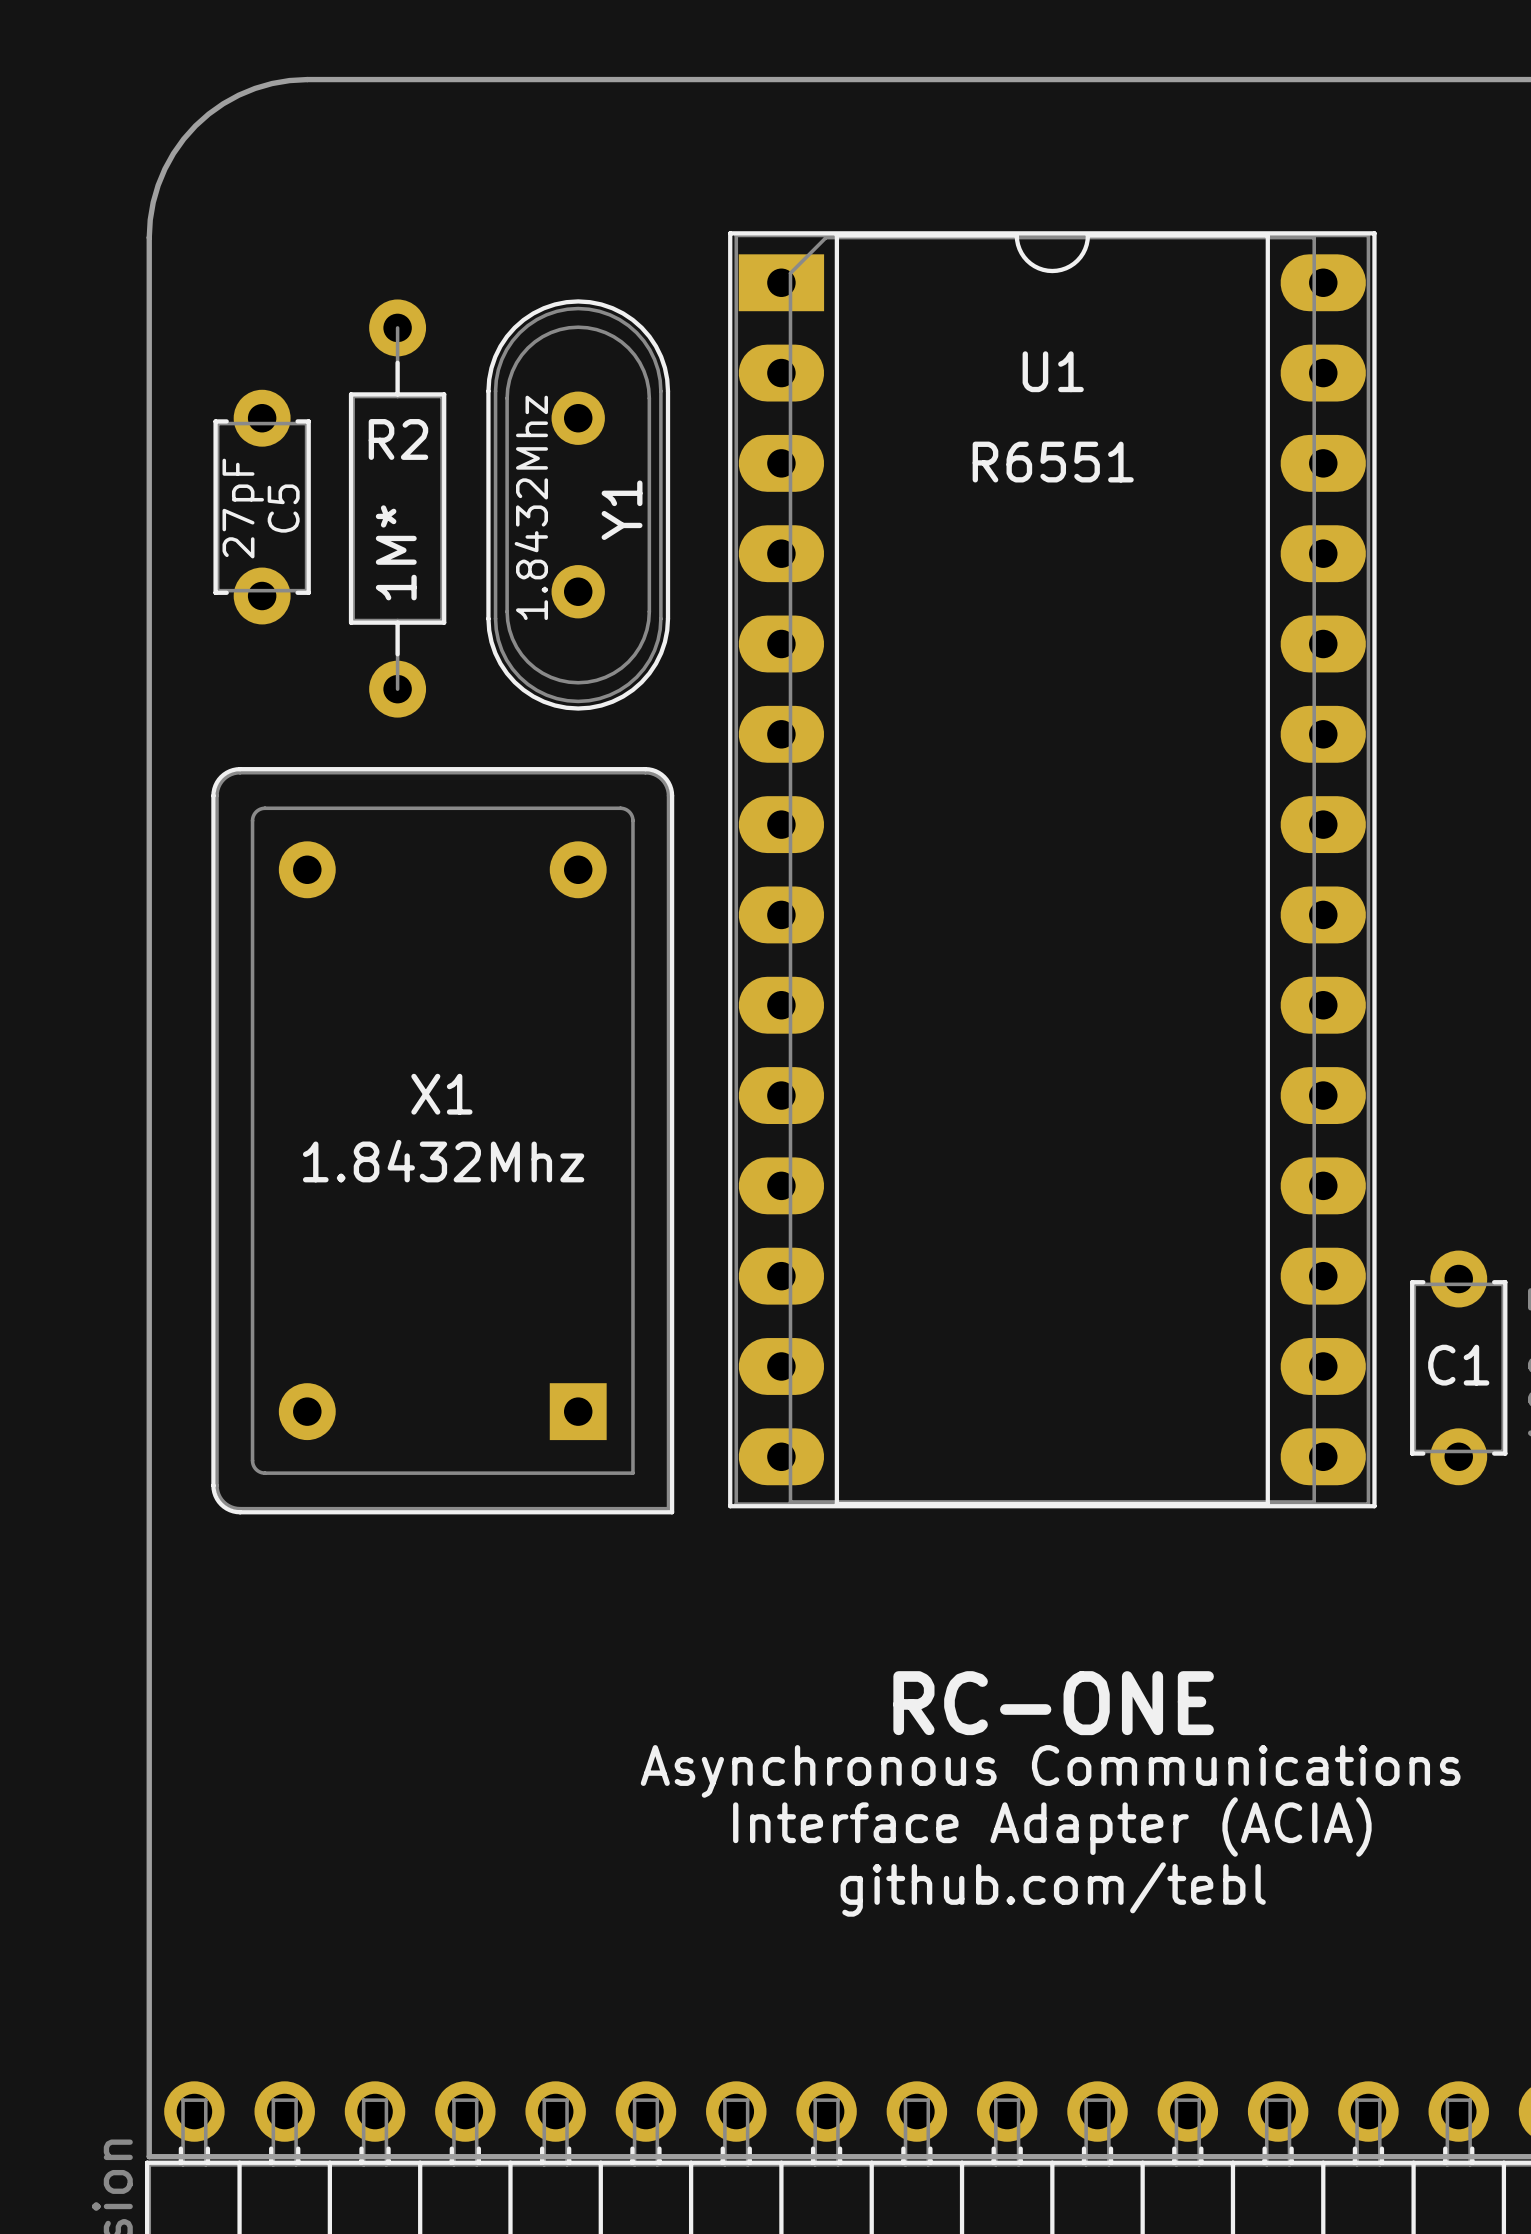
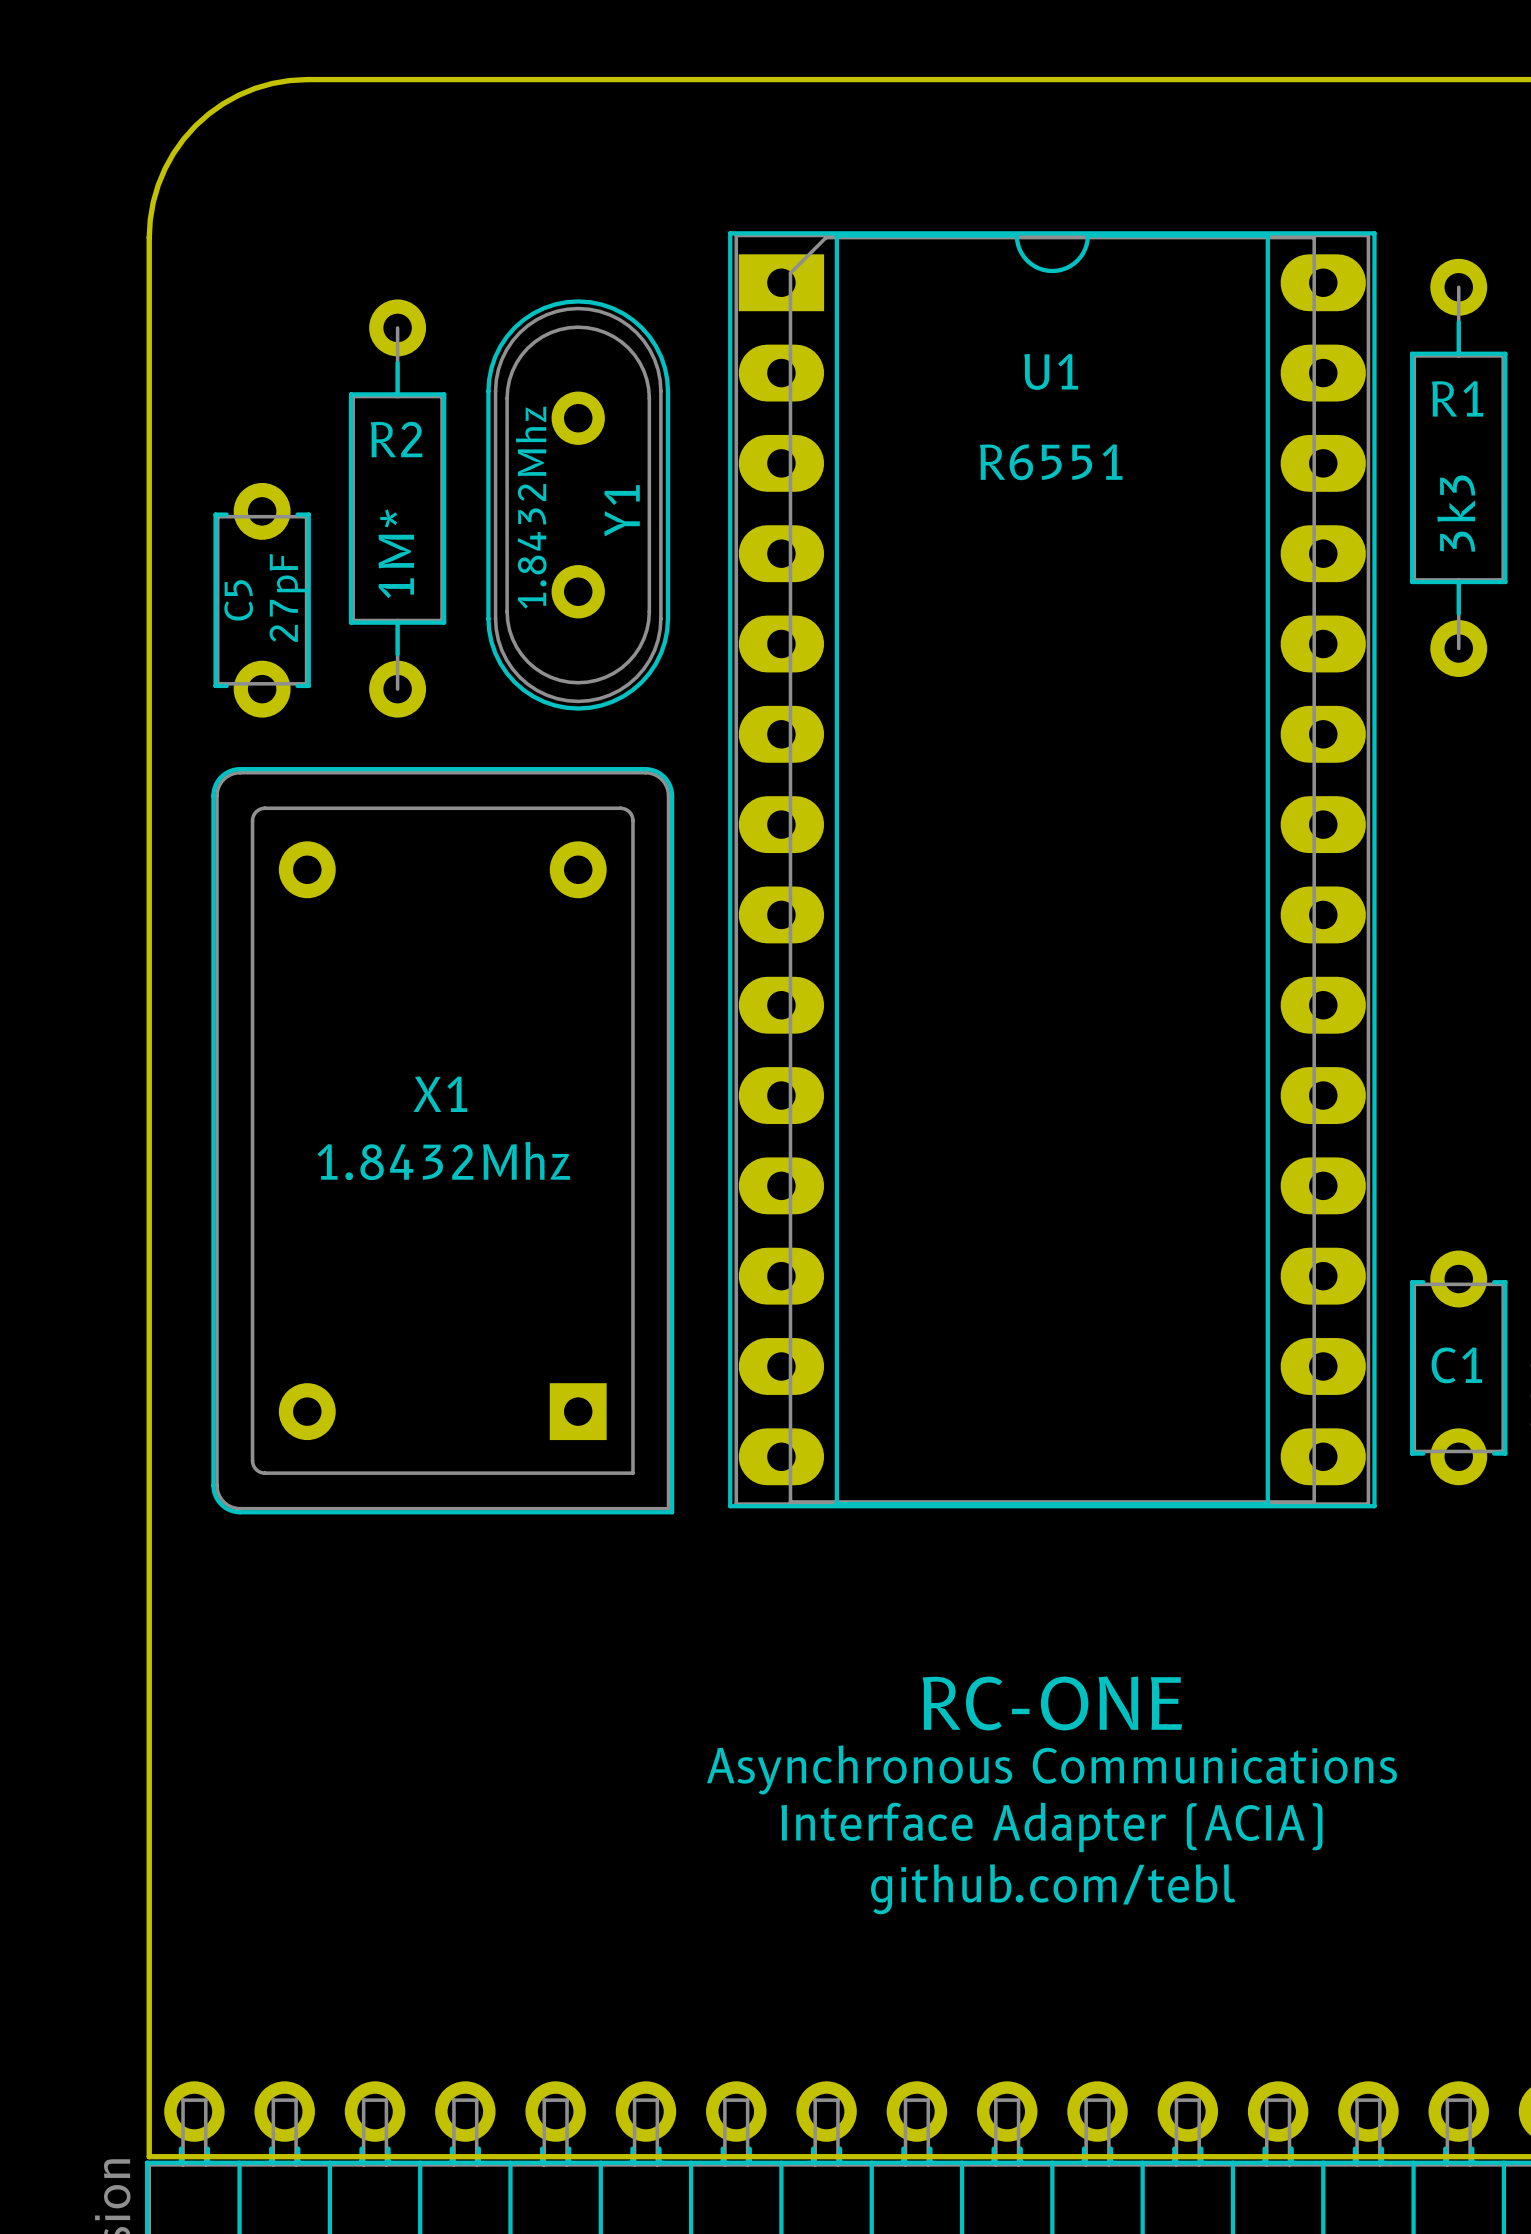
R1: none -> 3k3 (1458, 467)
C5 position: (262, 507) -> (262, 600)
C5 value position: 27pF (243, 508) -> 27pF (288, 597)
C5 name position: C5 (283, 508) -> C5 (238, 600)

